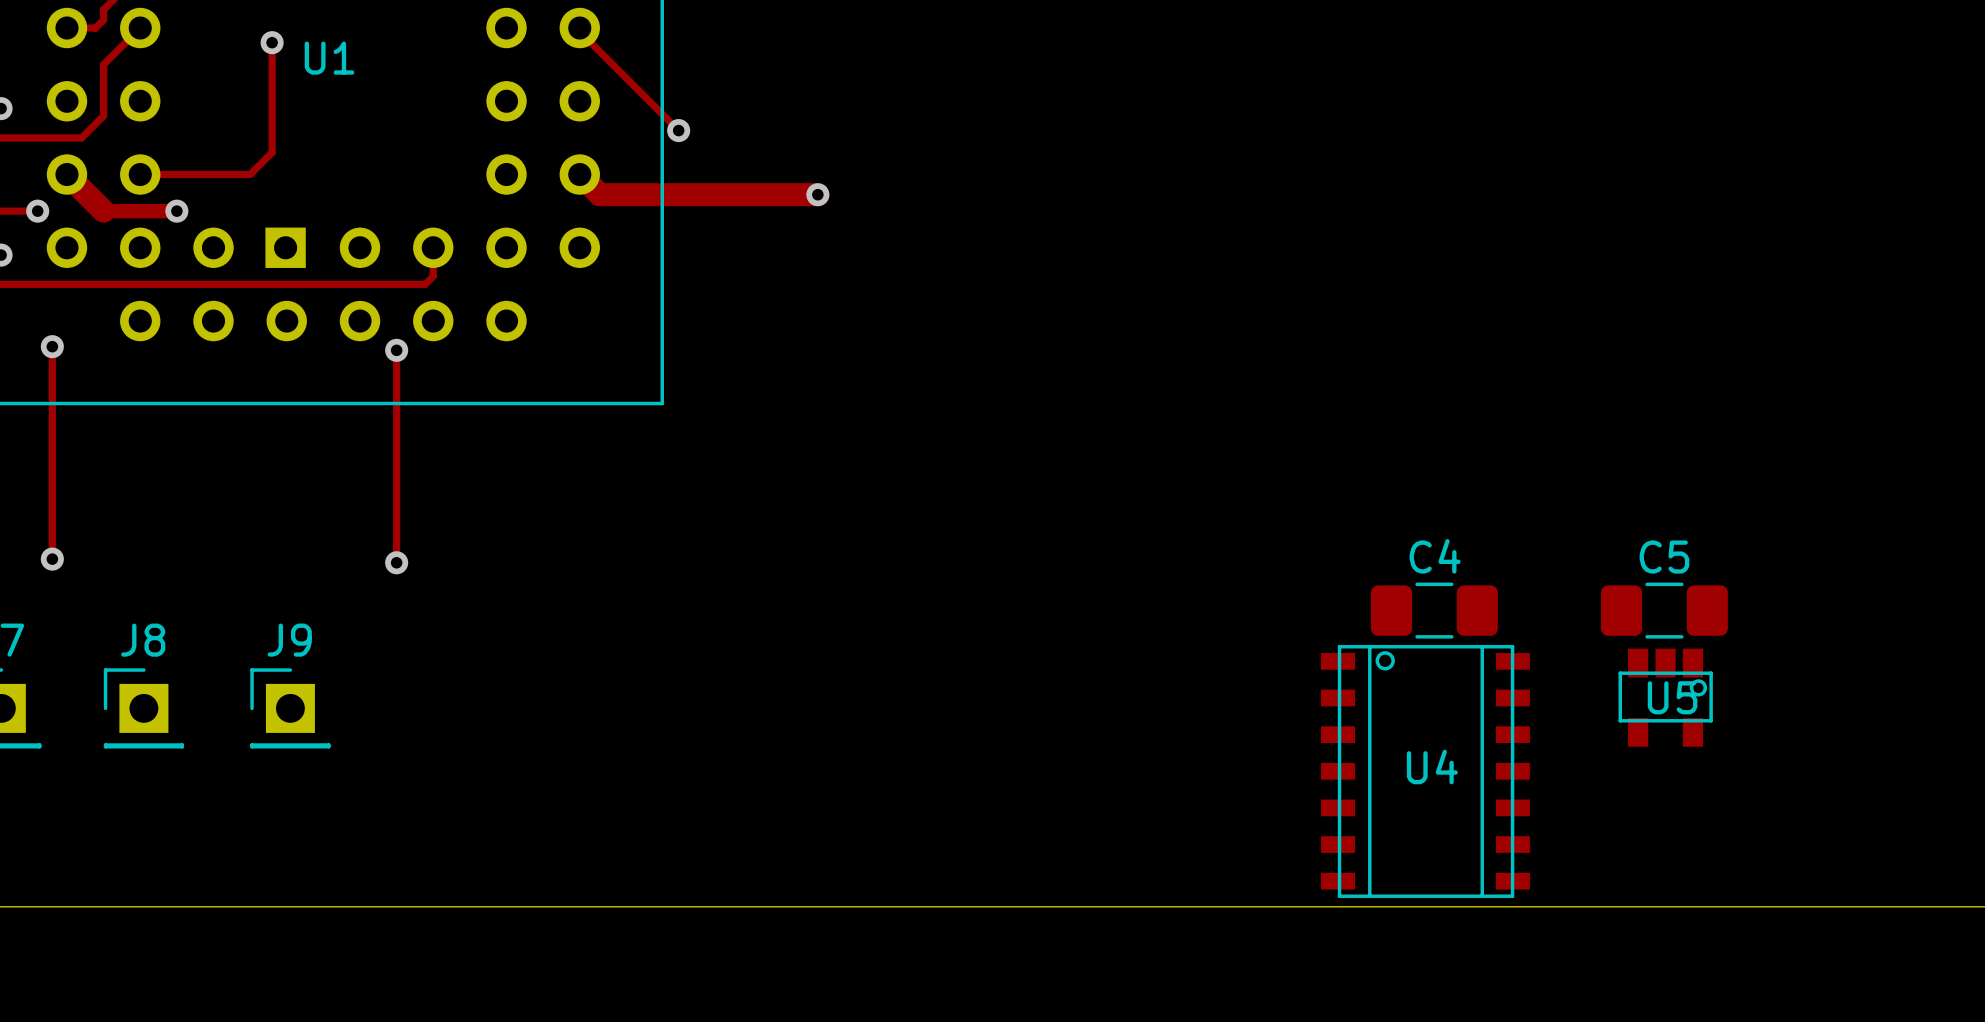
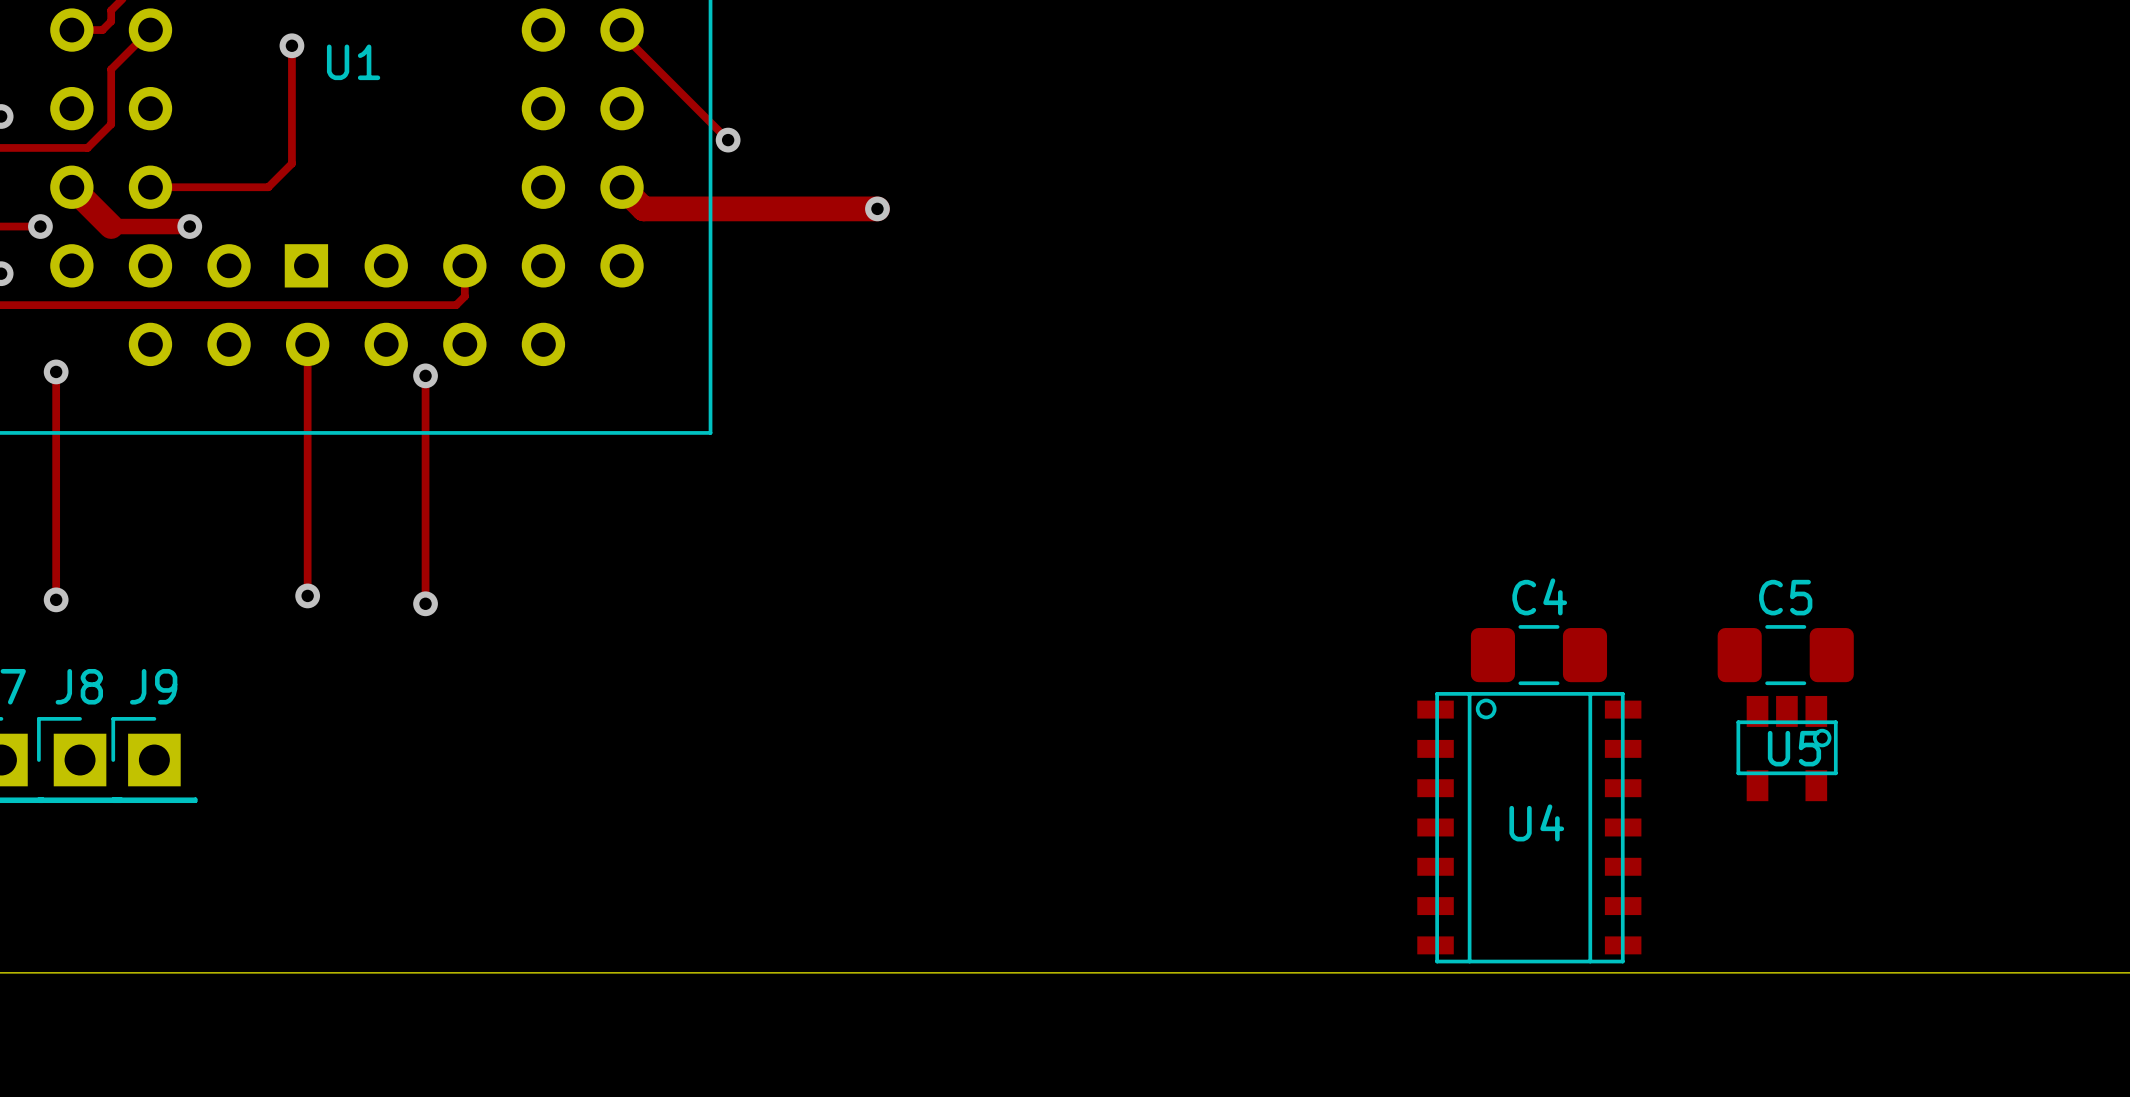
track: none -> (307, 344) (307, 595)
via: none -> (307, 595)
J8 name: J8 (143, 640) -> J9 (153, 686)
J8: none -> (80, 760)
J9: (290, 708) -> none

